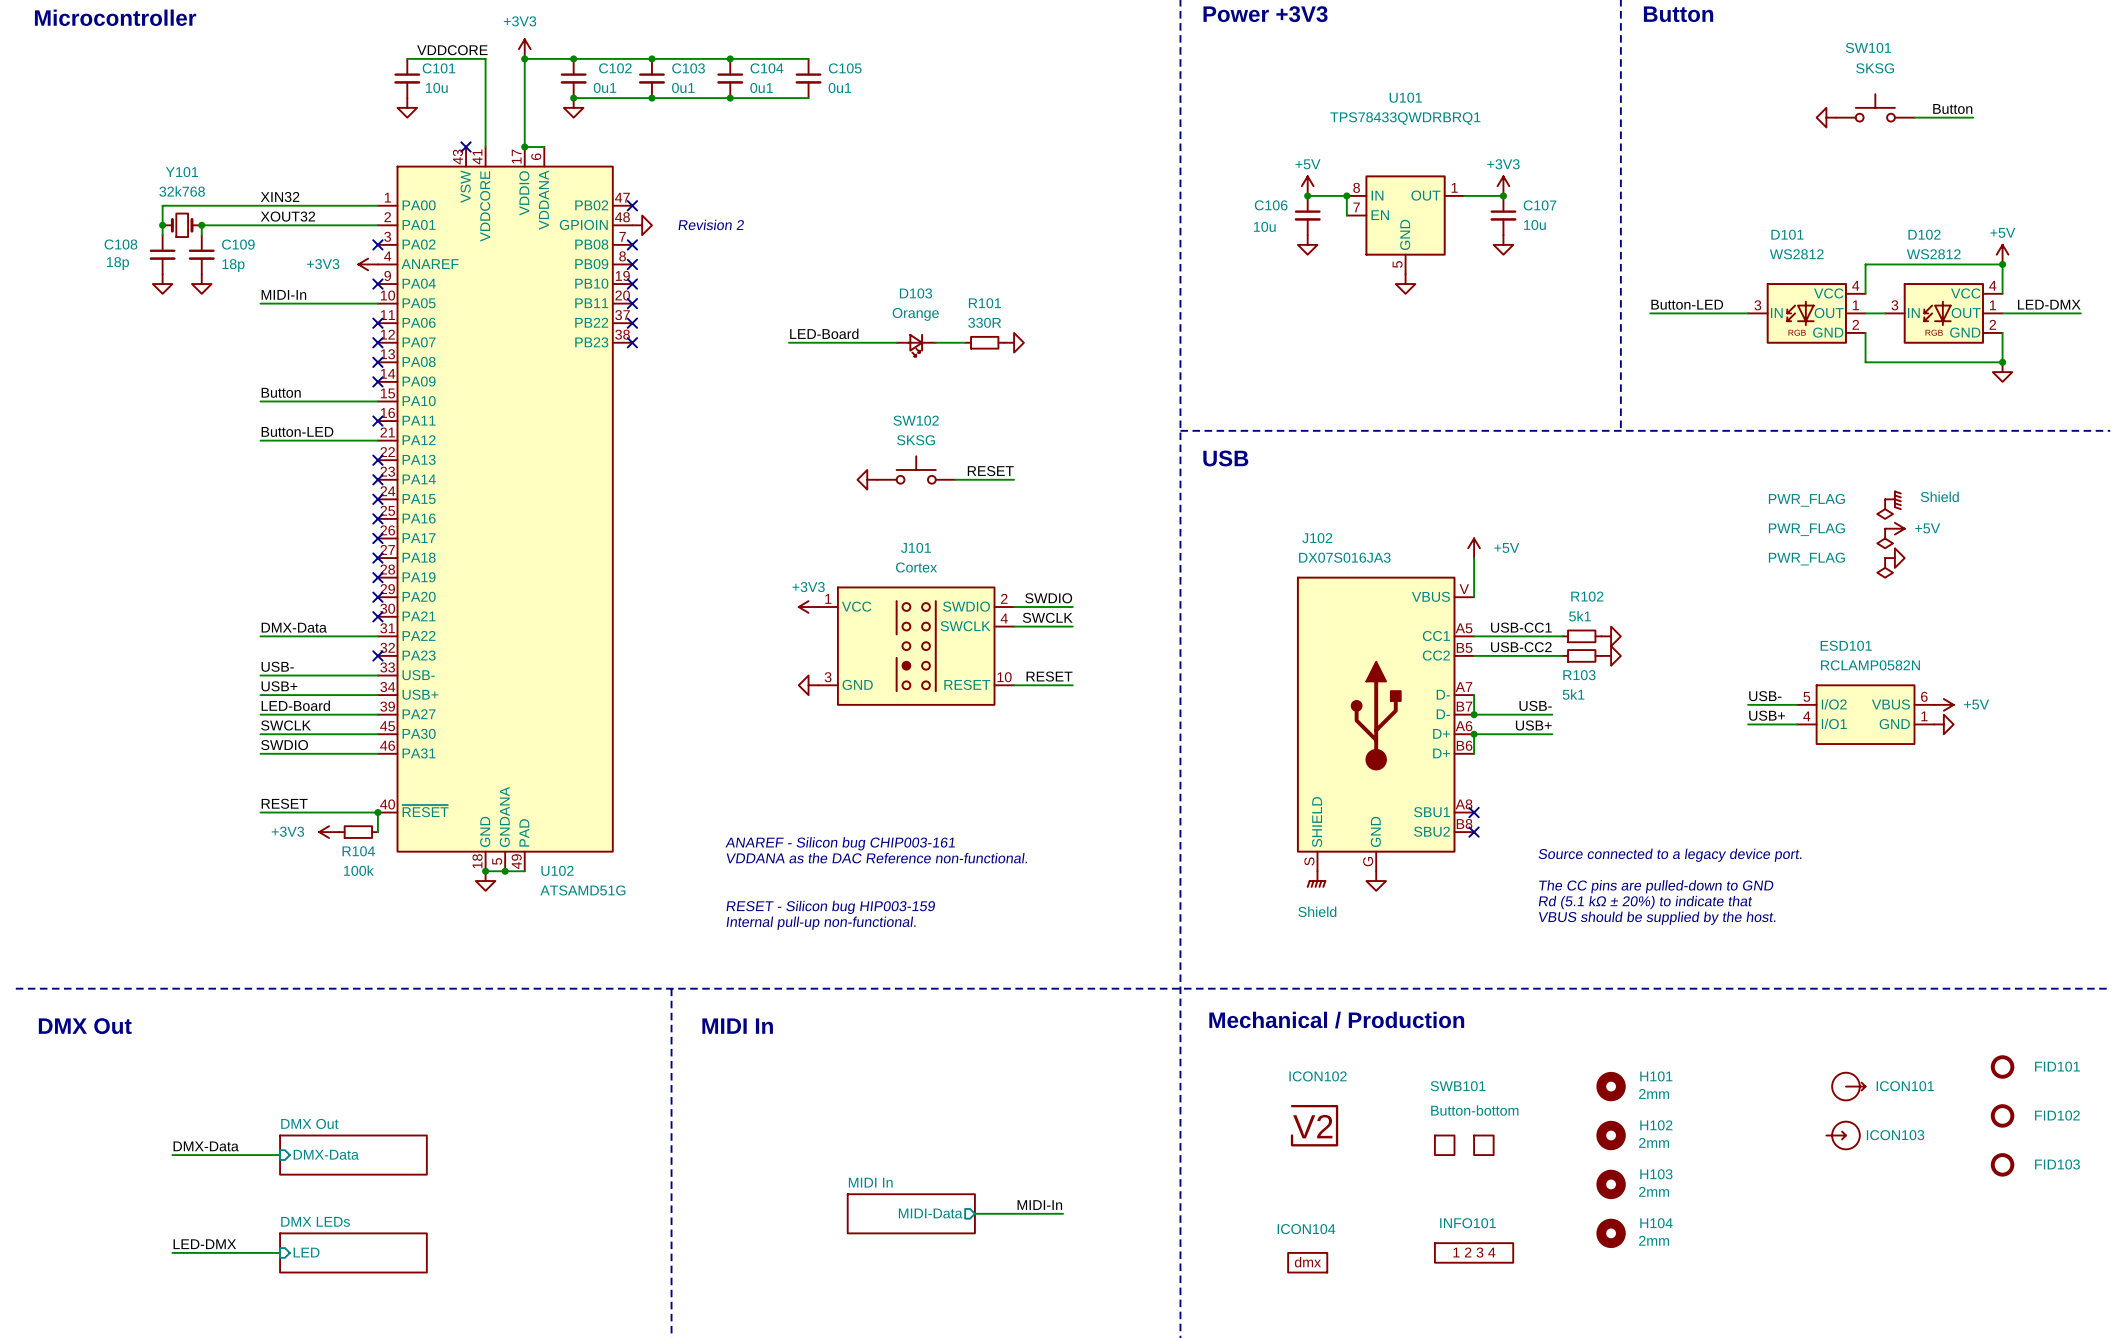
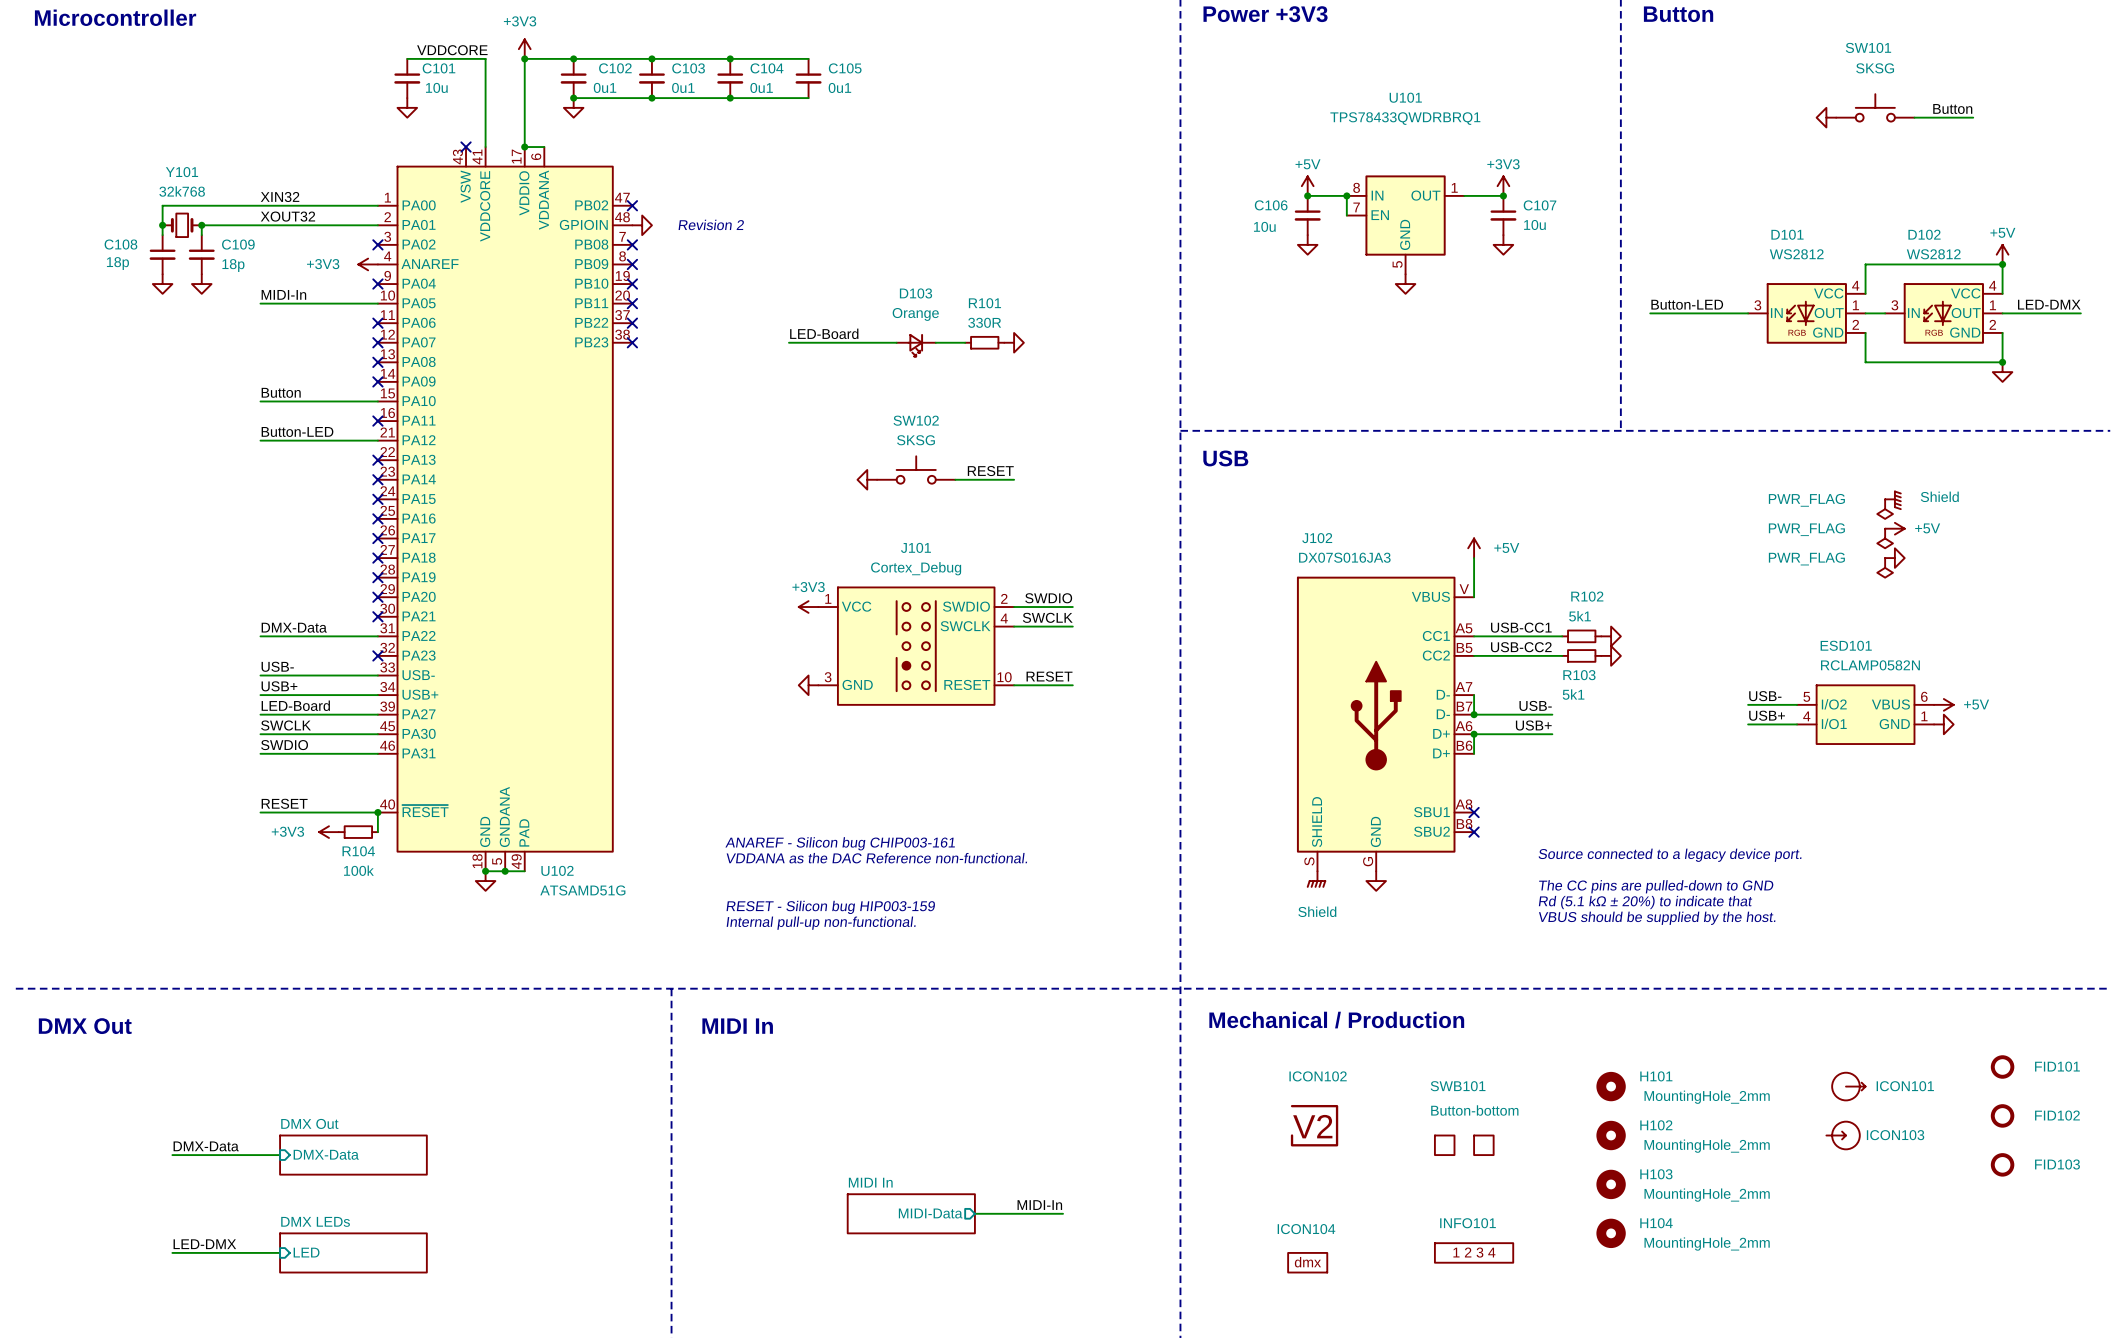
J101 value: Cortex (916, 567) -> Cortex_Debug (916, 568)
H101 value: 2mm (1654, 1093) -> MountingHole_2mm (1707, 1097)
H102 value: 2mm (1654, 1142) -> MountingHole_2mm (1707, 1146)
H103 value: 2mm (1654, 1191) -> MountingHole_2mm (1707, 1195)
H104 value: 2mm (1654, 1240) -> MountingHole_2mm (1707, 1244)

